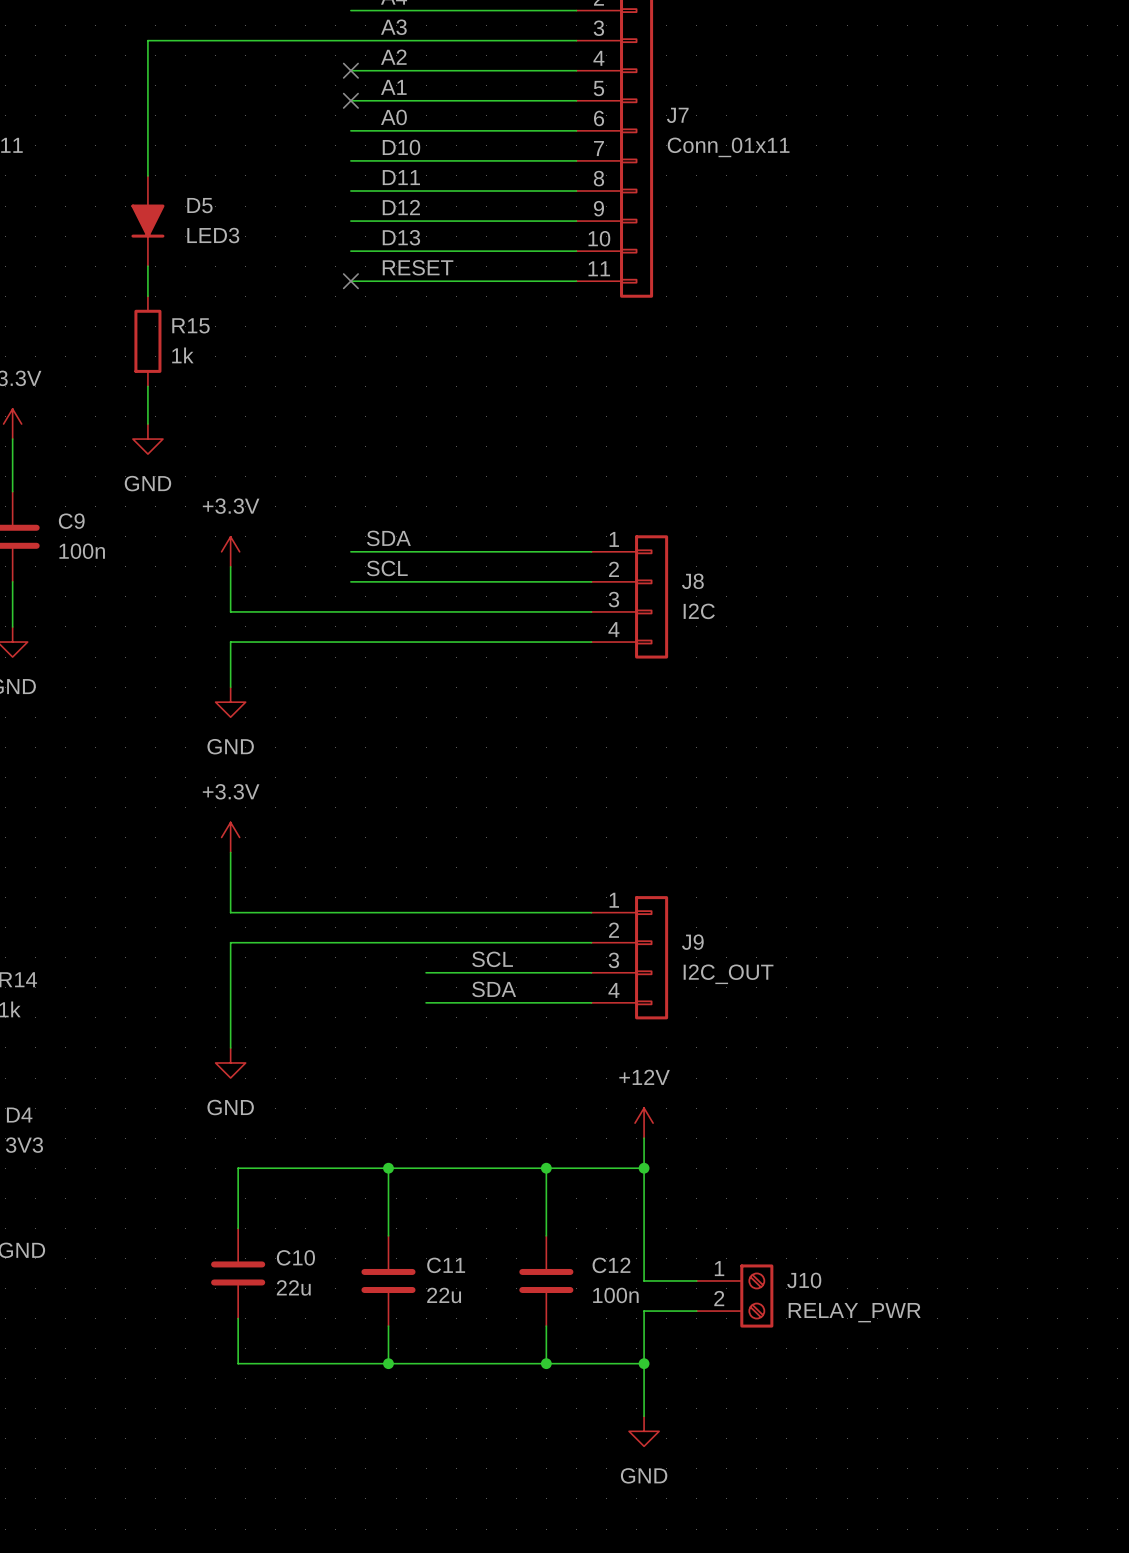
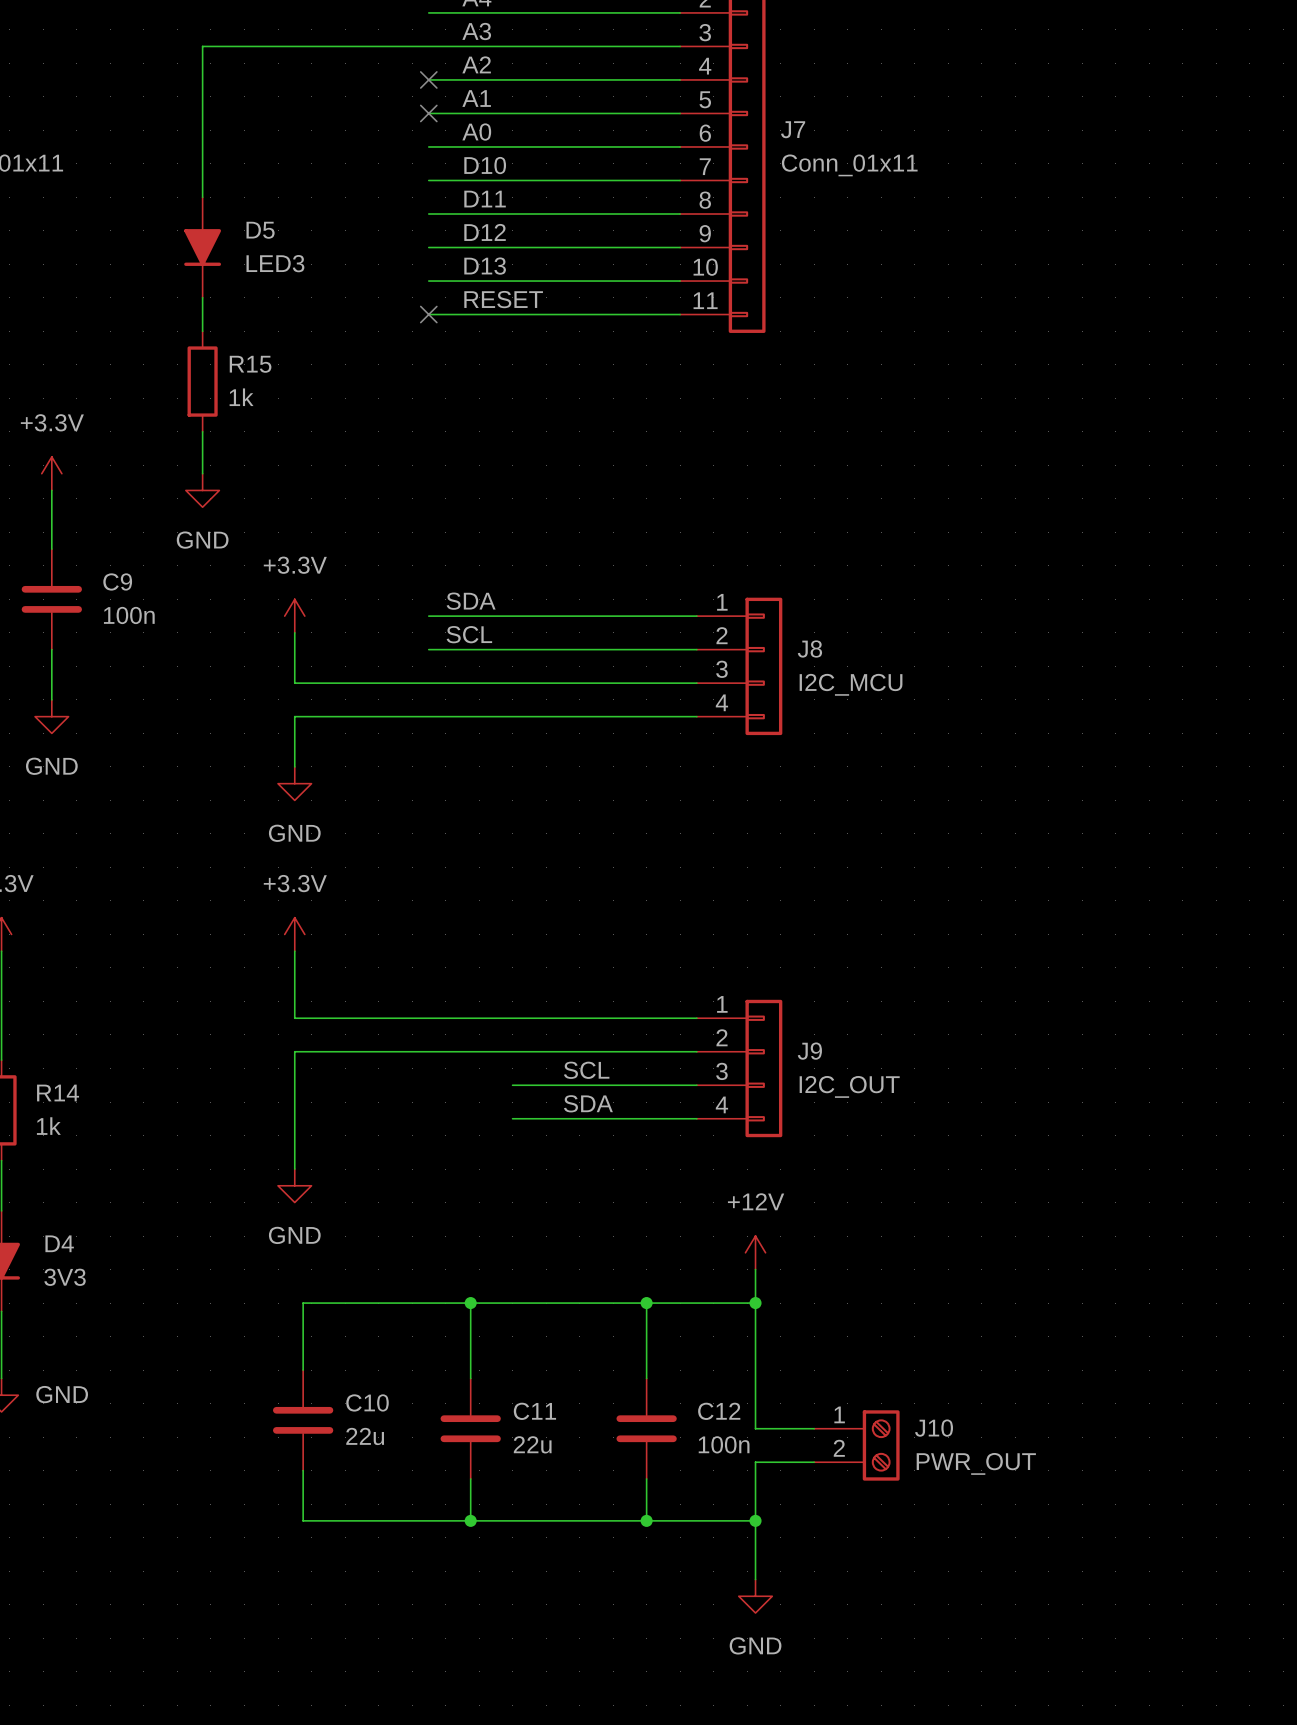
J8 value: I2C (699, 611) -> I2C_MCU (851, 684)
J10 value: RELAY_PWR (854, 1312) -> PWR_OUT (976, 1463)

